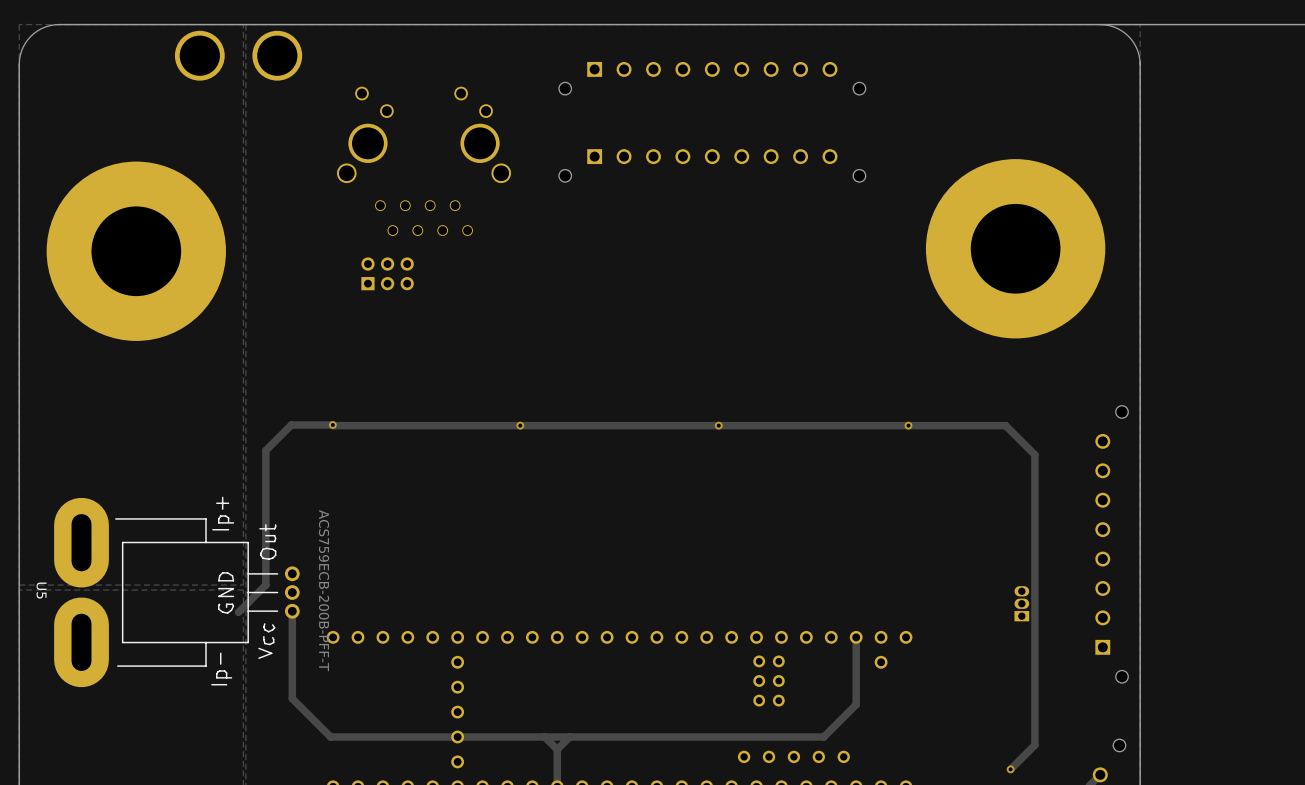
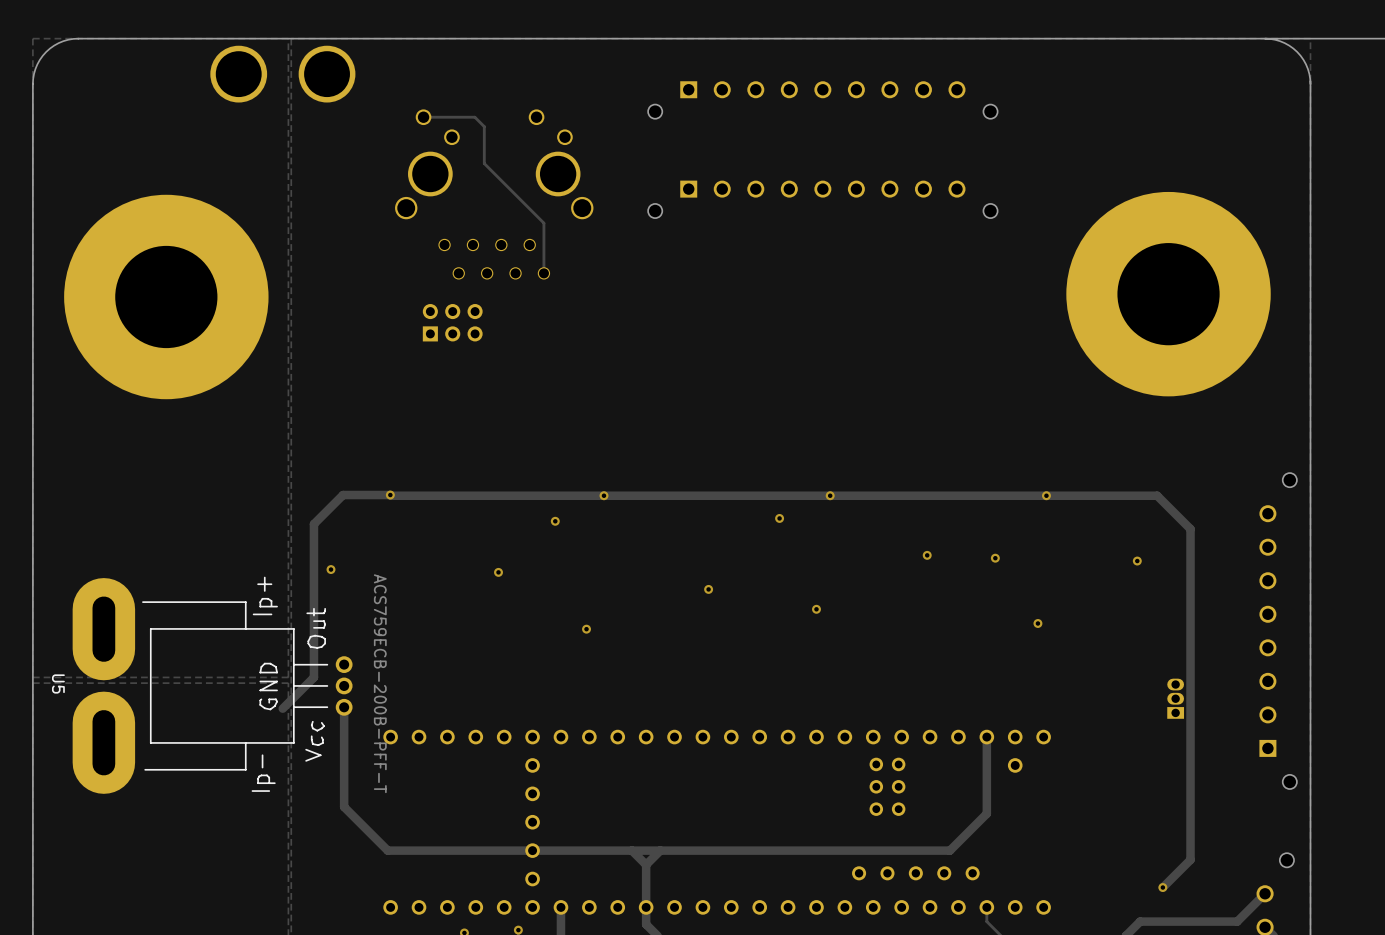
track: none -> (423, 117) (474, 117) (484, 126) (484, 163) (543, 223) (543, 273)
via: none -> (779, 518)
via: none -> (555, 521)
via: none -> (927, 555)
via: none -> (995, 558)
via: none -> (1137, 561)
via: none -> (331, 569)
via: none -> (498, 572)
via: none -> (708, 589)
via: none -> (816, 609)
via: none -> (1037, 623)
via: none -> (586, 629)

